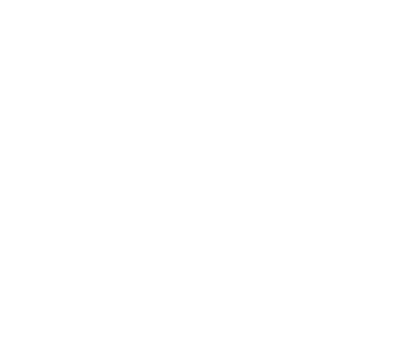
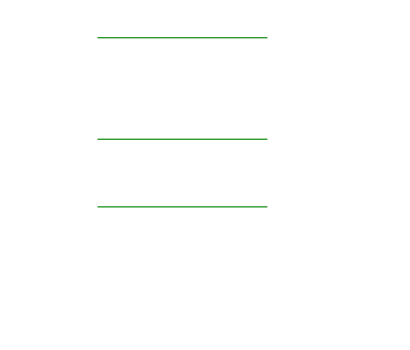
wire: none -> (97, 37) (266, 37)
wire: none -> (97, 139) (266, 139)
wire: none -> (97, 206) (266, 206)

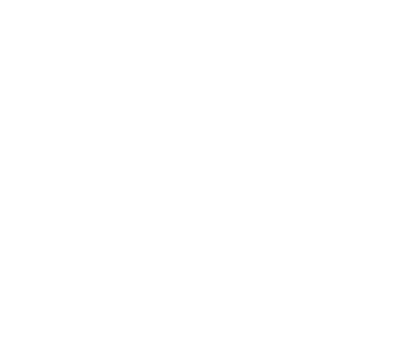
wire: (97, 37) (266, 37) -> none
wire: (97, 139) (266, 139) -> none
wire: (97, 206) (266, 206) -> none

